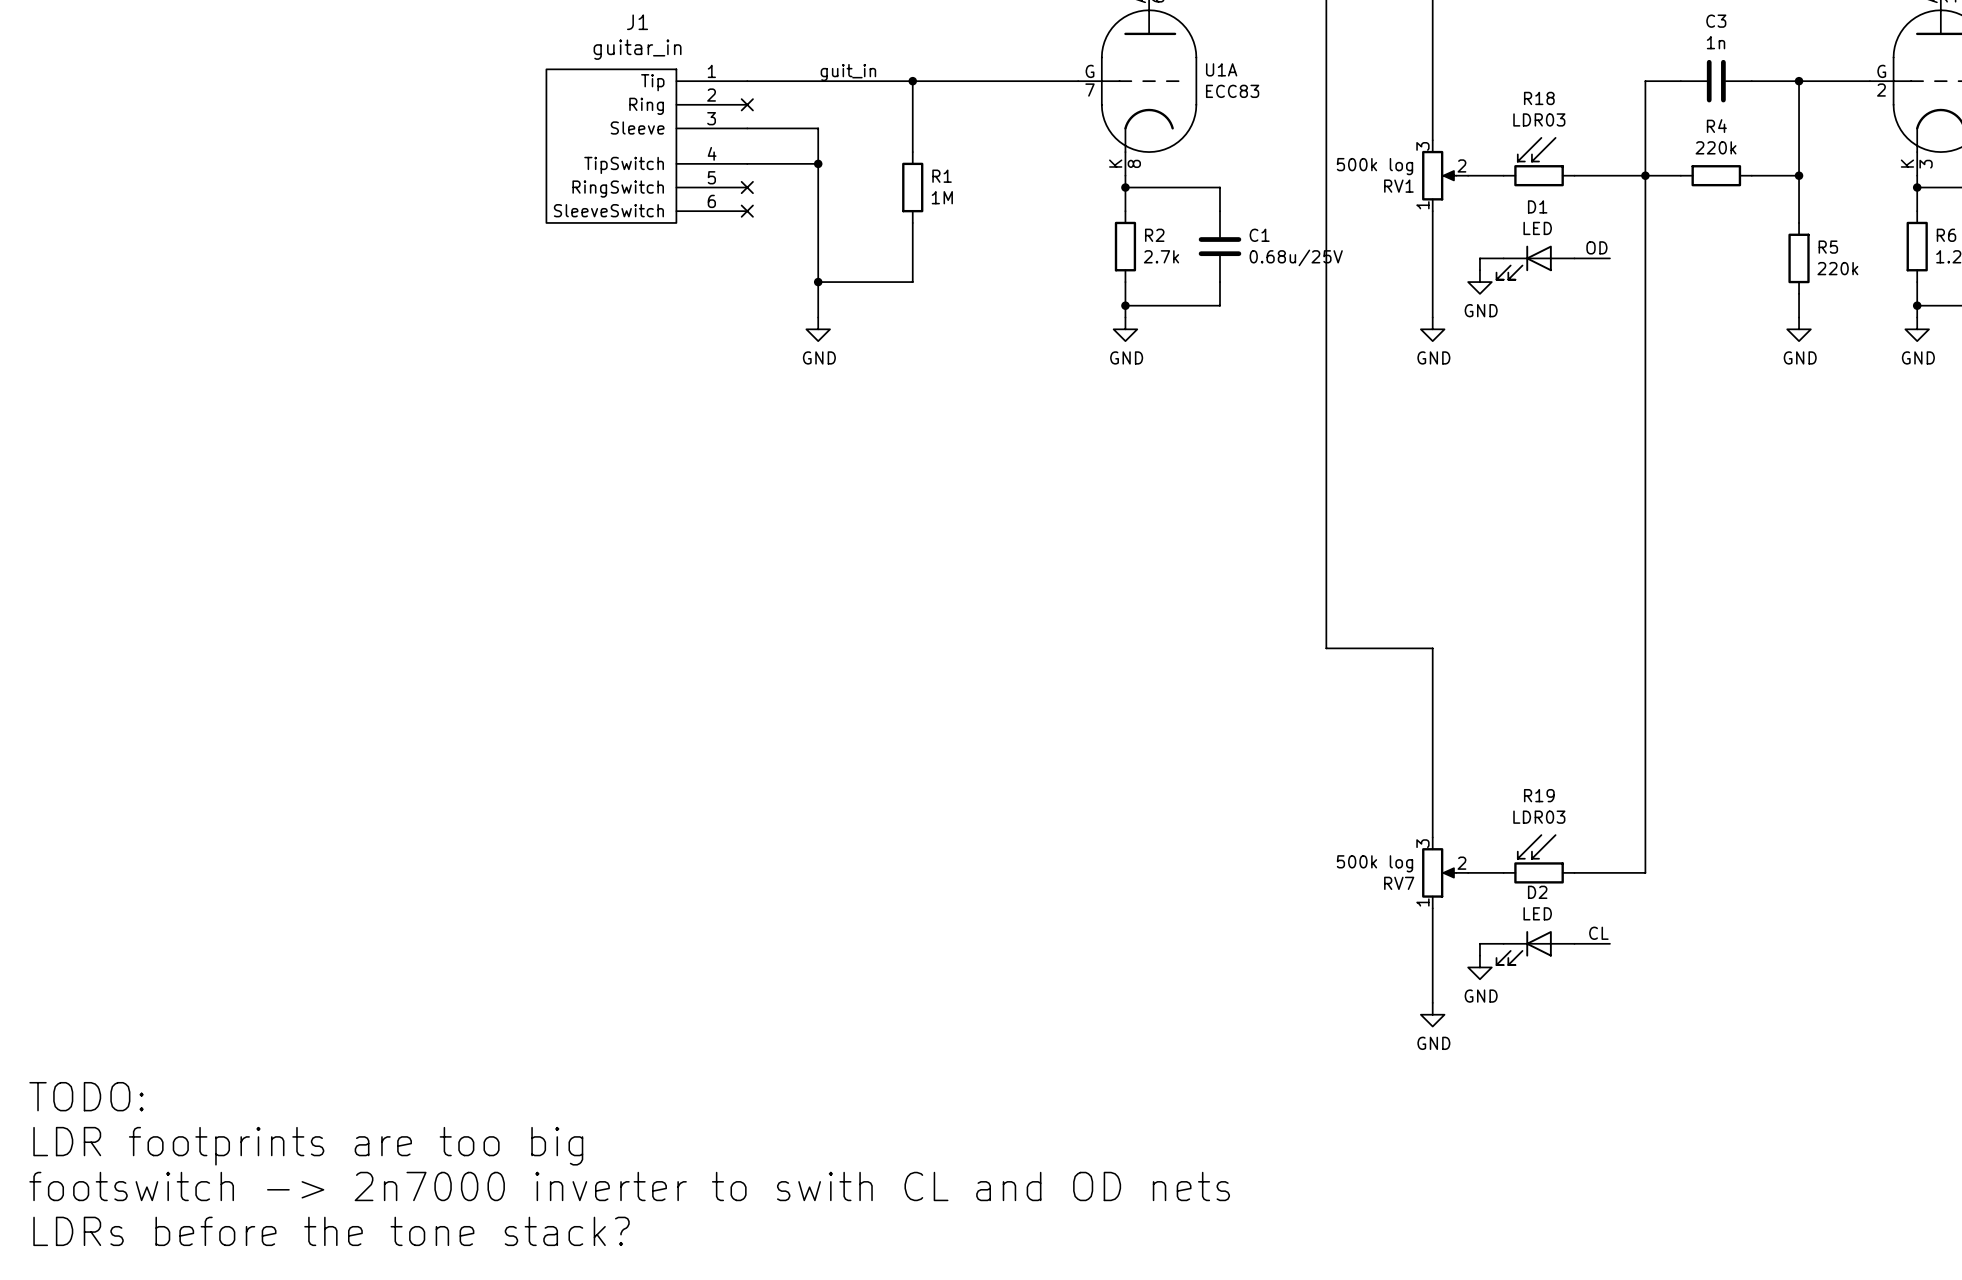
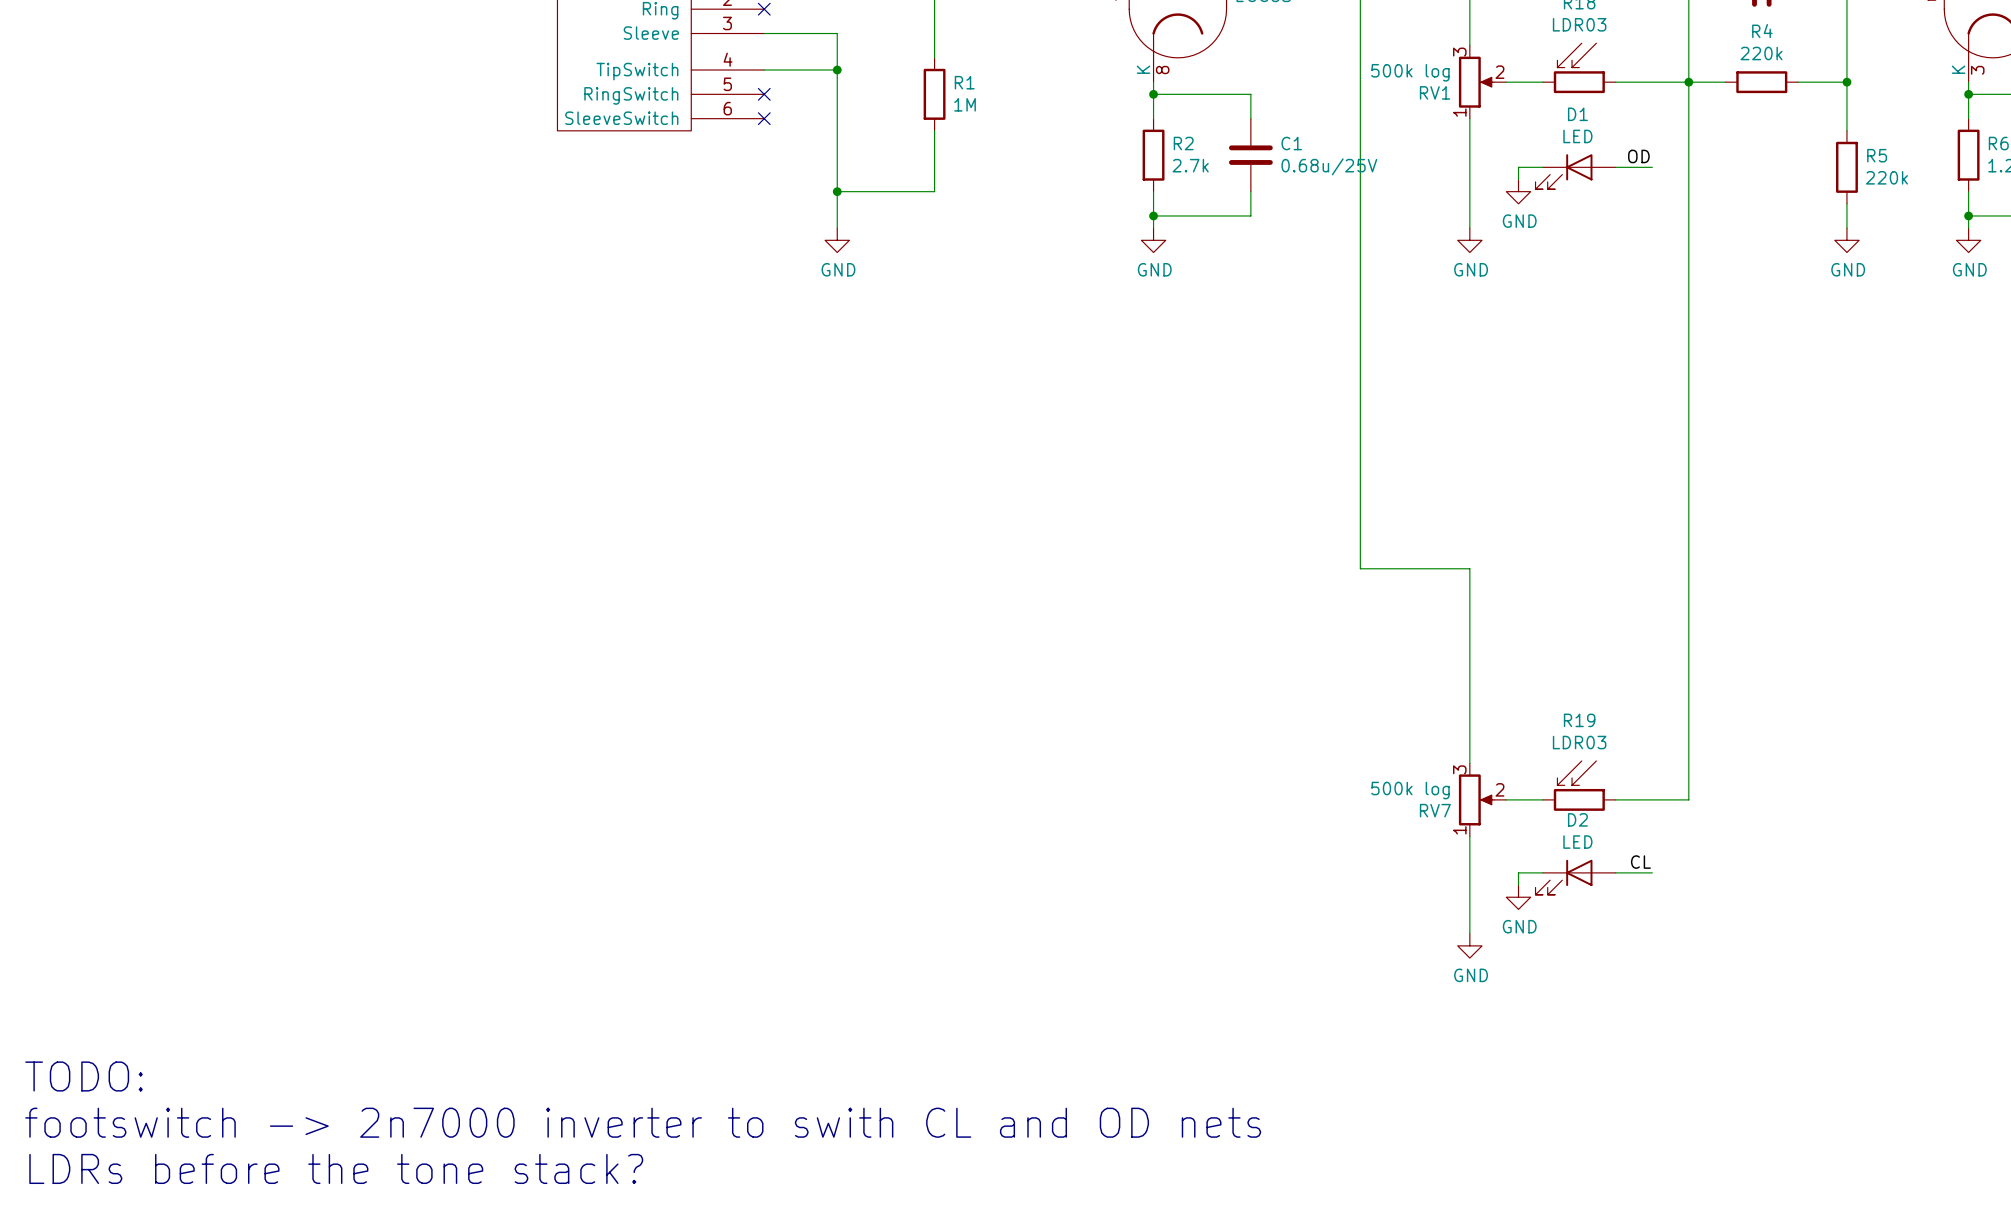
text: TODO: (86, 1096) -> none
text: LDR footprints are too big (308, 1146) -> TODO: (83, 1076)

